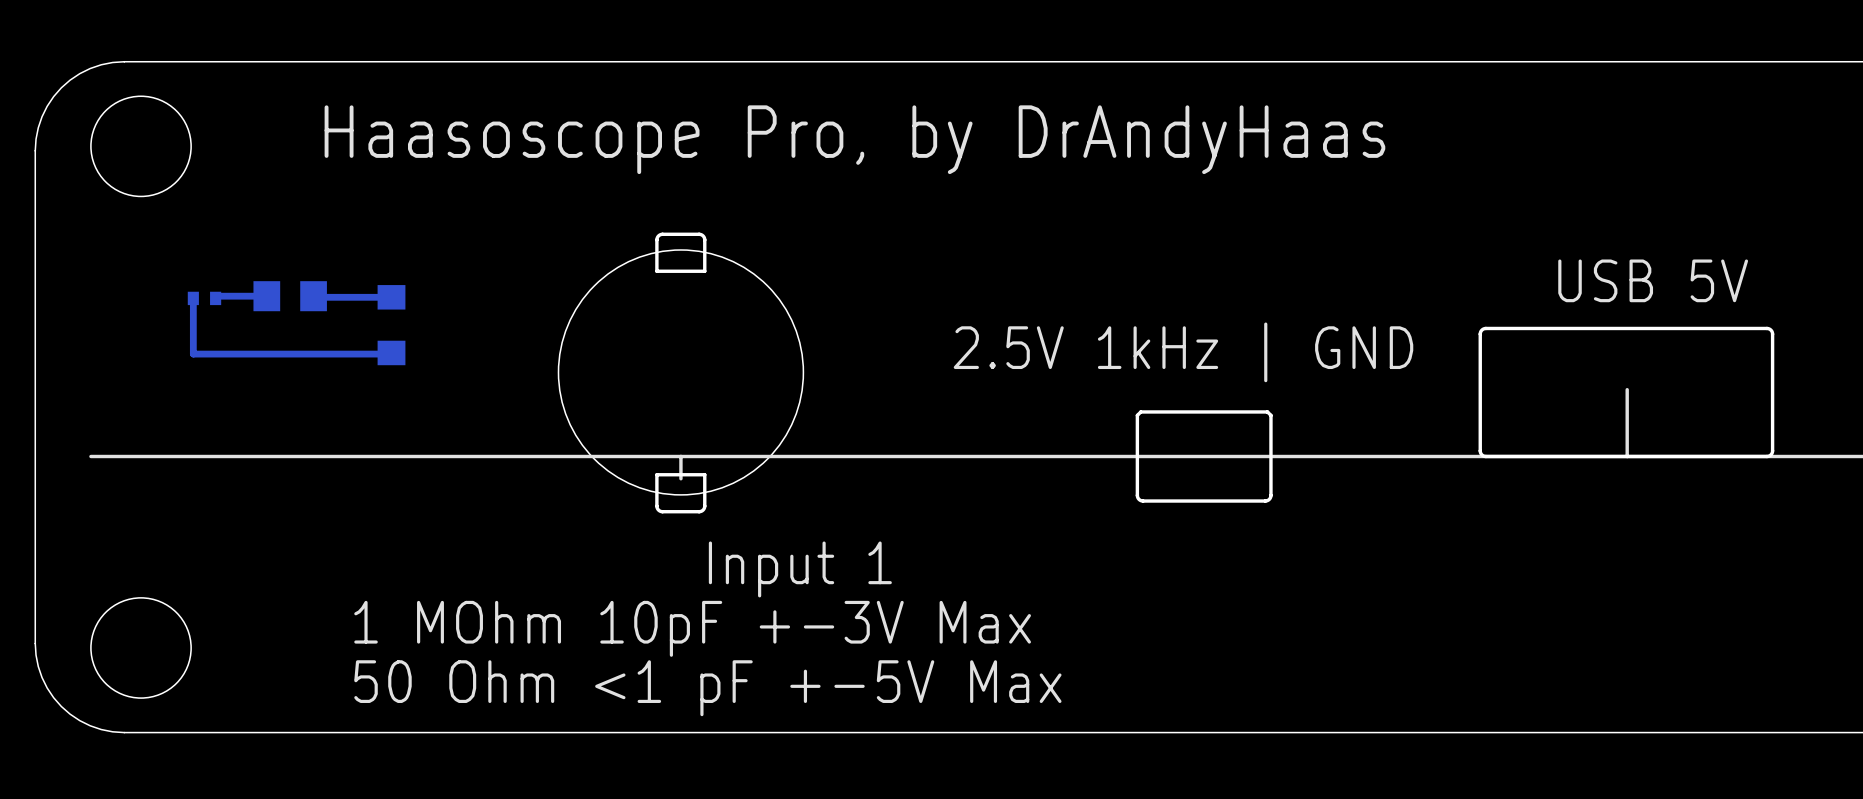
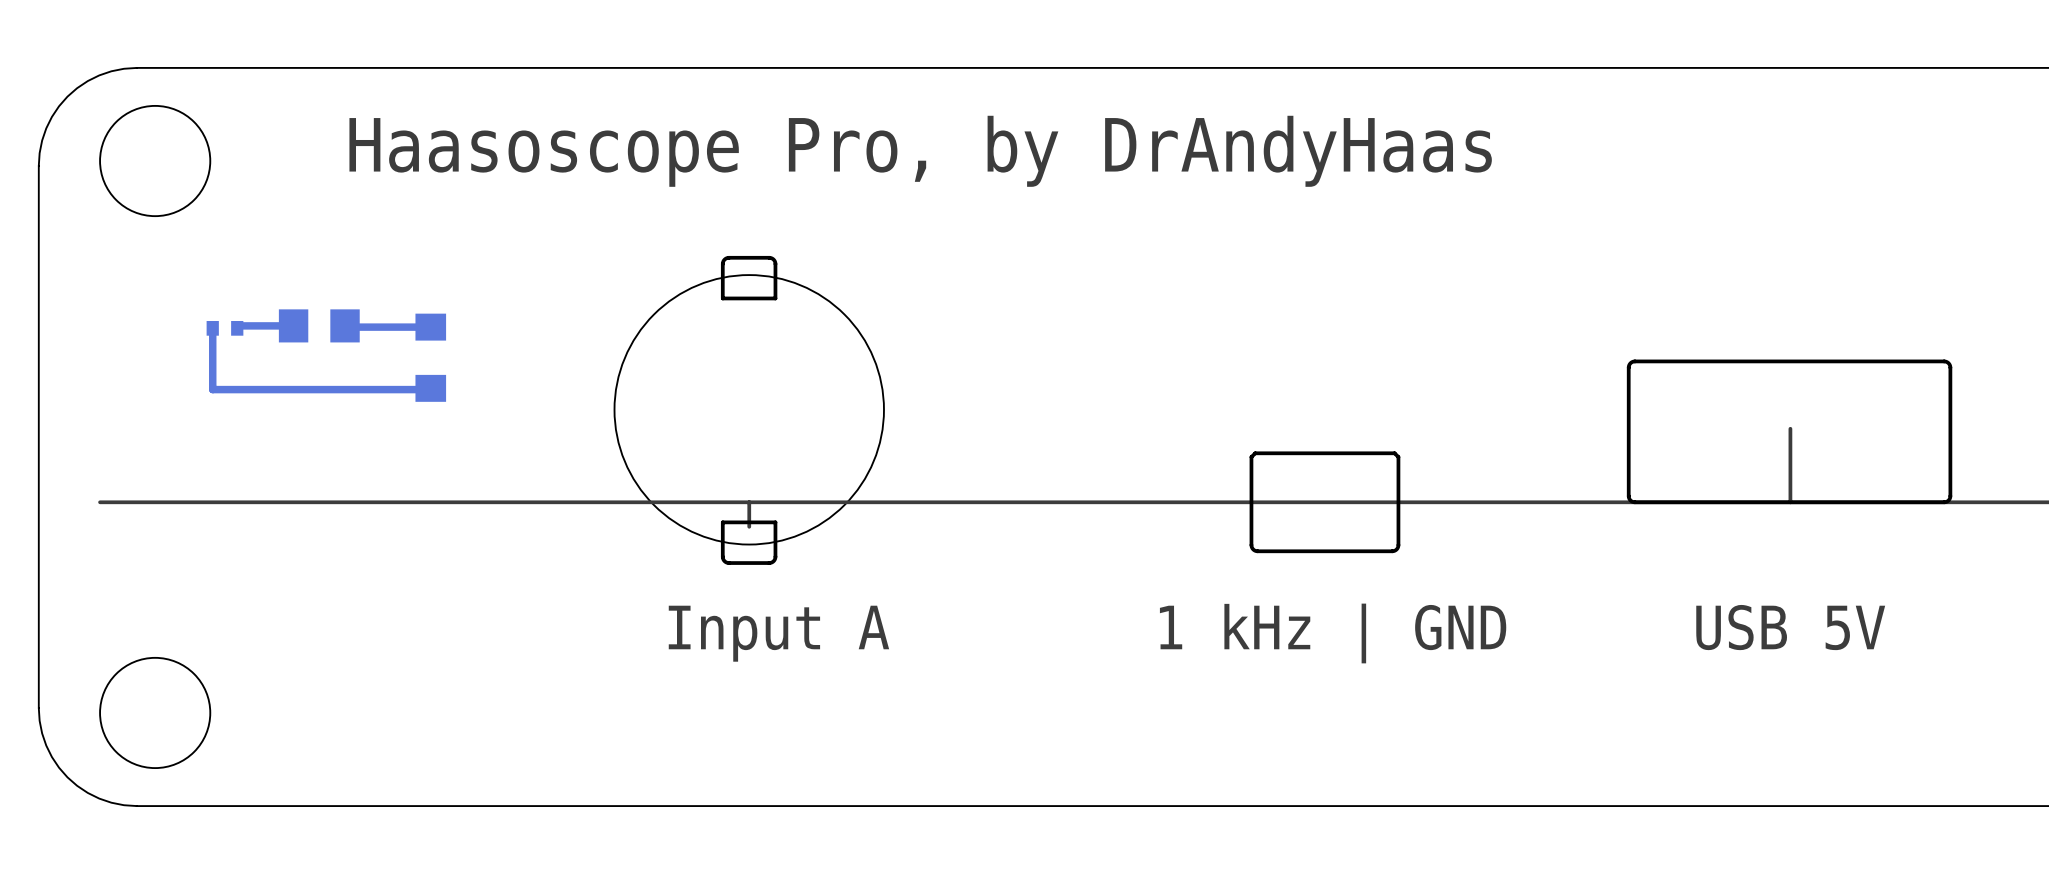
text position: USB 5V (1653, 280) -> USB 5V (1790, 627)
text: 2.5V 1kHz | GND (1183, 352) -> none
text: Input 1 (800, 569) -> none
text: none -> 1 kHz | GND (1333, 633)
text: none -> Input A (778, 633)
text: 1 MOhm 10pF +-3V Max (692, 628) -> none
text: 50 Ohm <1 pF +-5V Max (707, 688) -> none

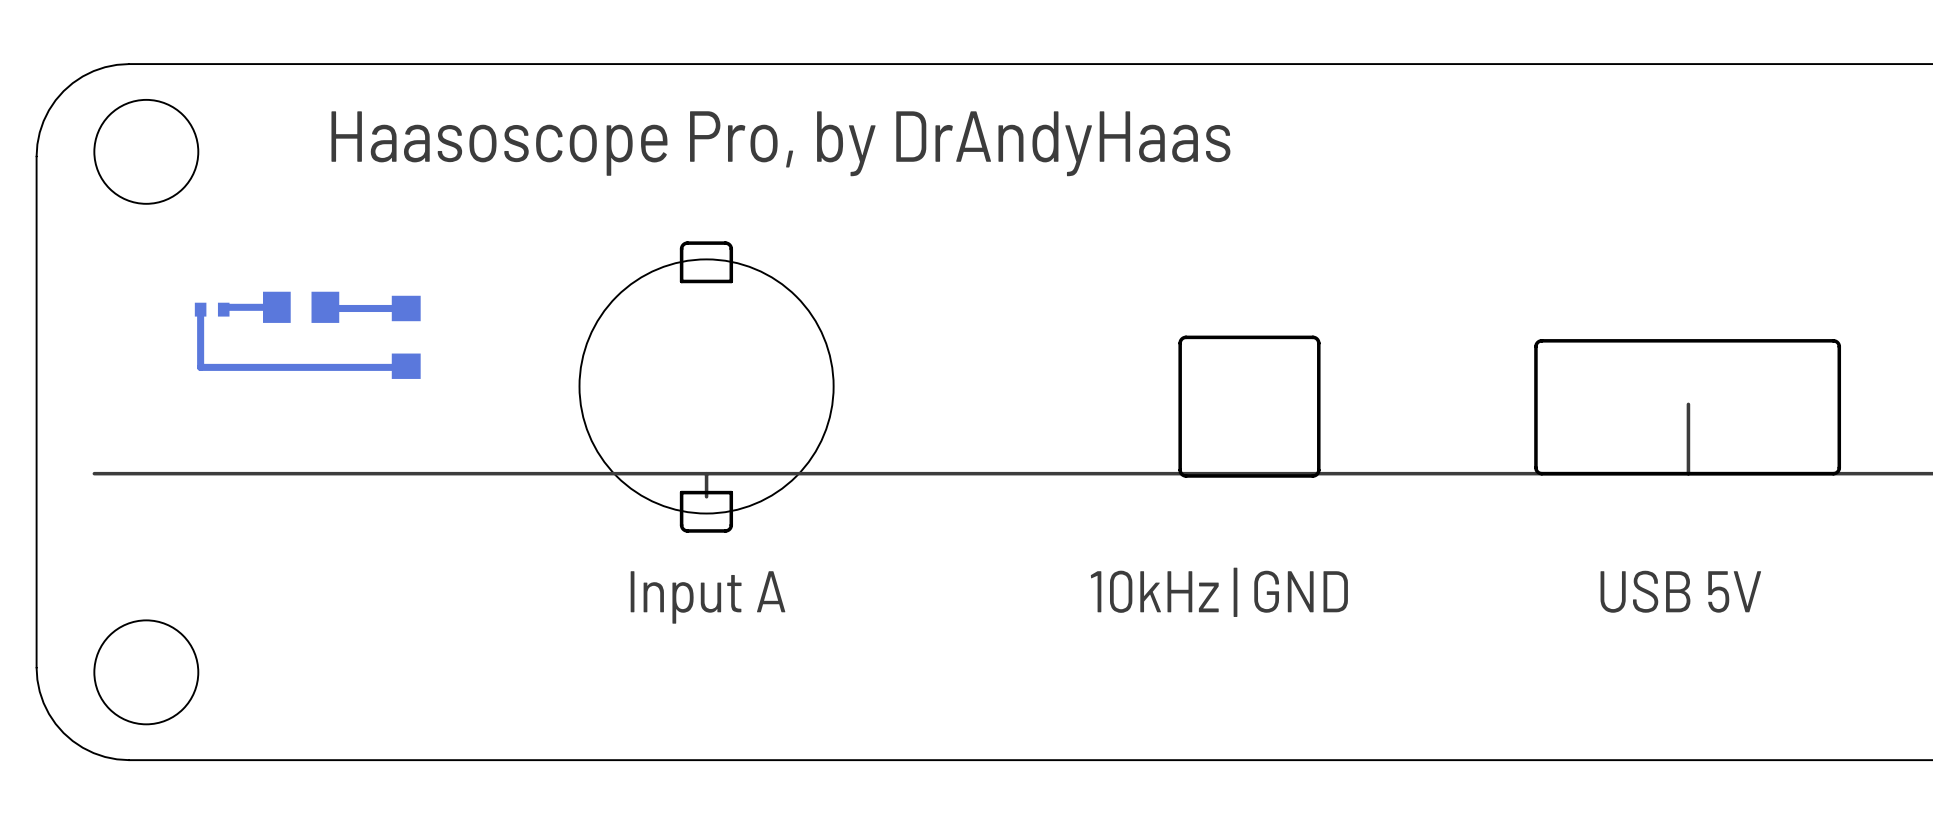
board edge: (1251, 457) (1255, 453) (1394, 453) (1398, 457) -> (1180, 431) (1180, 343) (1181, 339) (1186, 337) (1316, 338) (1318, 343) (1318, 431)
board edge: (1251, 498) (1251, 545) (1253, 549) (1257, 551) (1394, 550) (1398, 545) (1398, 498) -> (1180, 470) (1181, 474) (1186, 475) (1312, 475) (1317, 474) (1318, 470)
text: 1 kHz | GND (1333, 633) -> 10kHz | GND (1219, 592)

